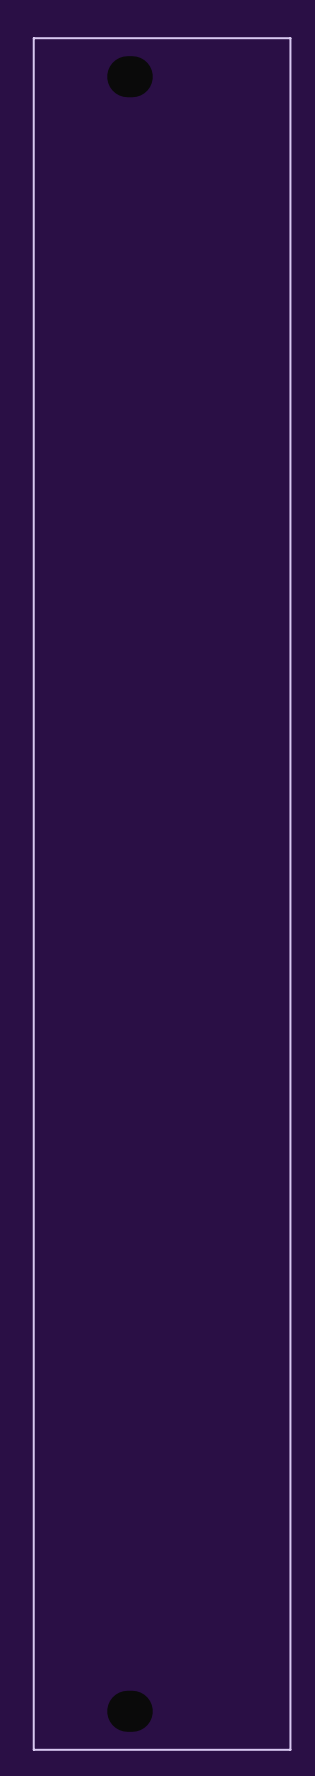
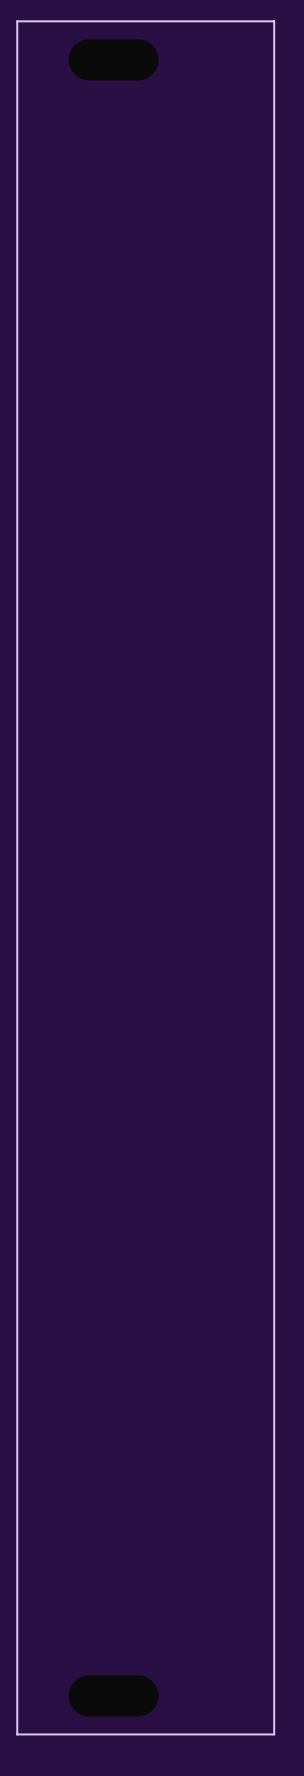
part footprint: [107, 56, 153, 98] -> [68, 39, 159, 81]
part footprint: [107, 1690, 153, 1732] -> [68, 1675, 159, 1717]

